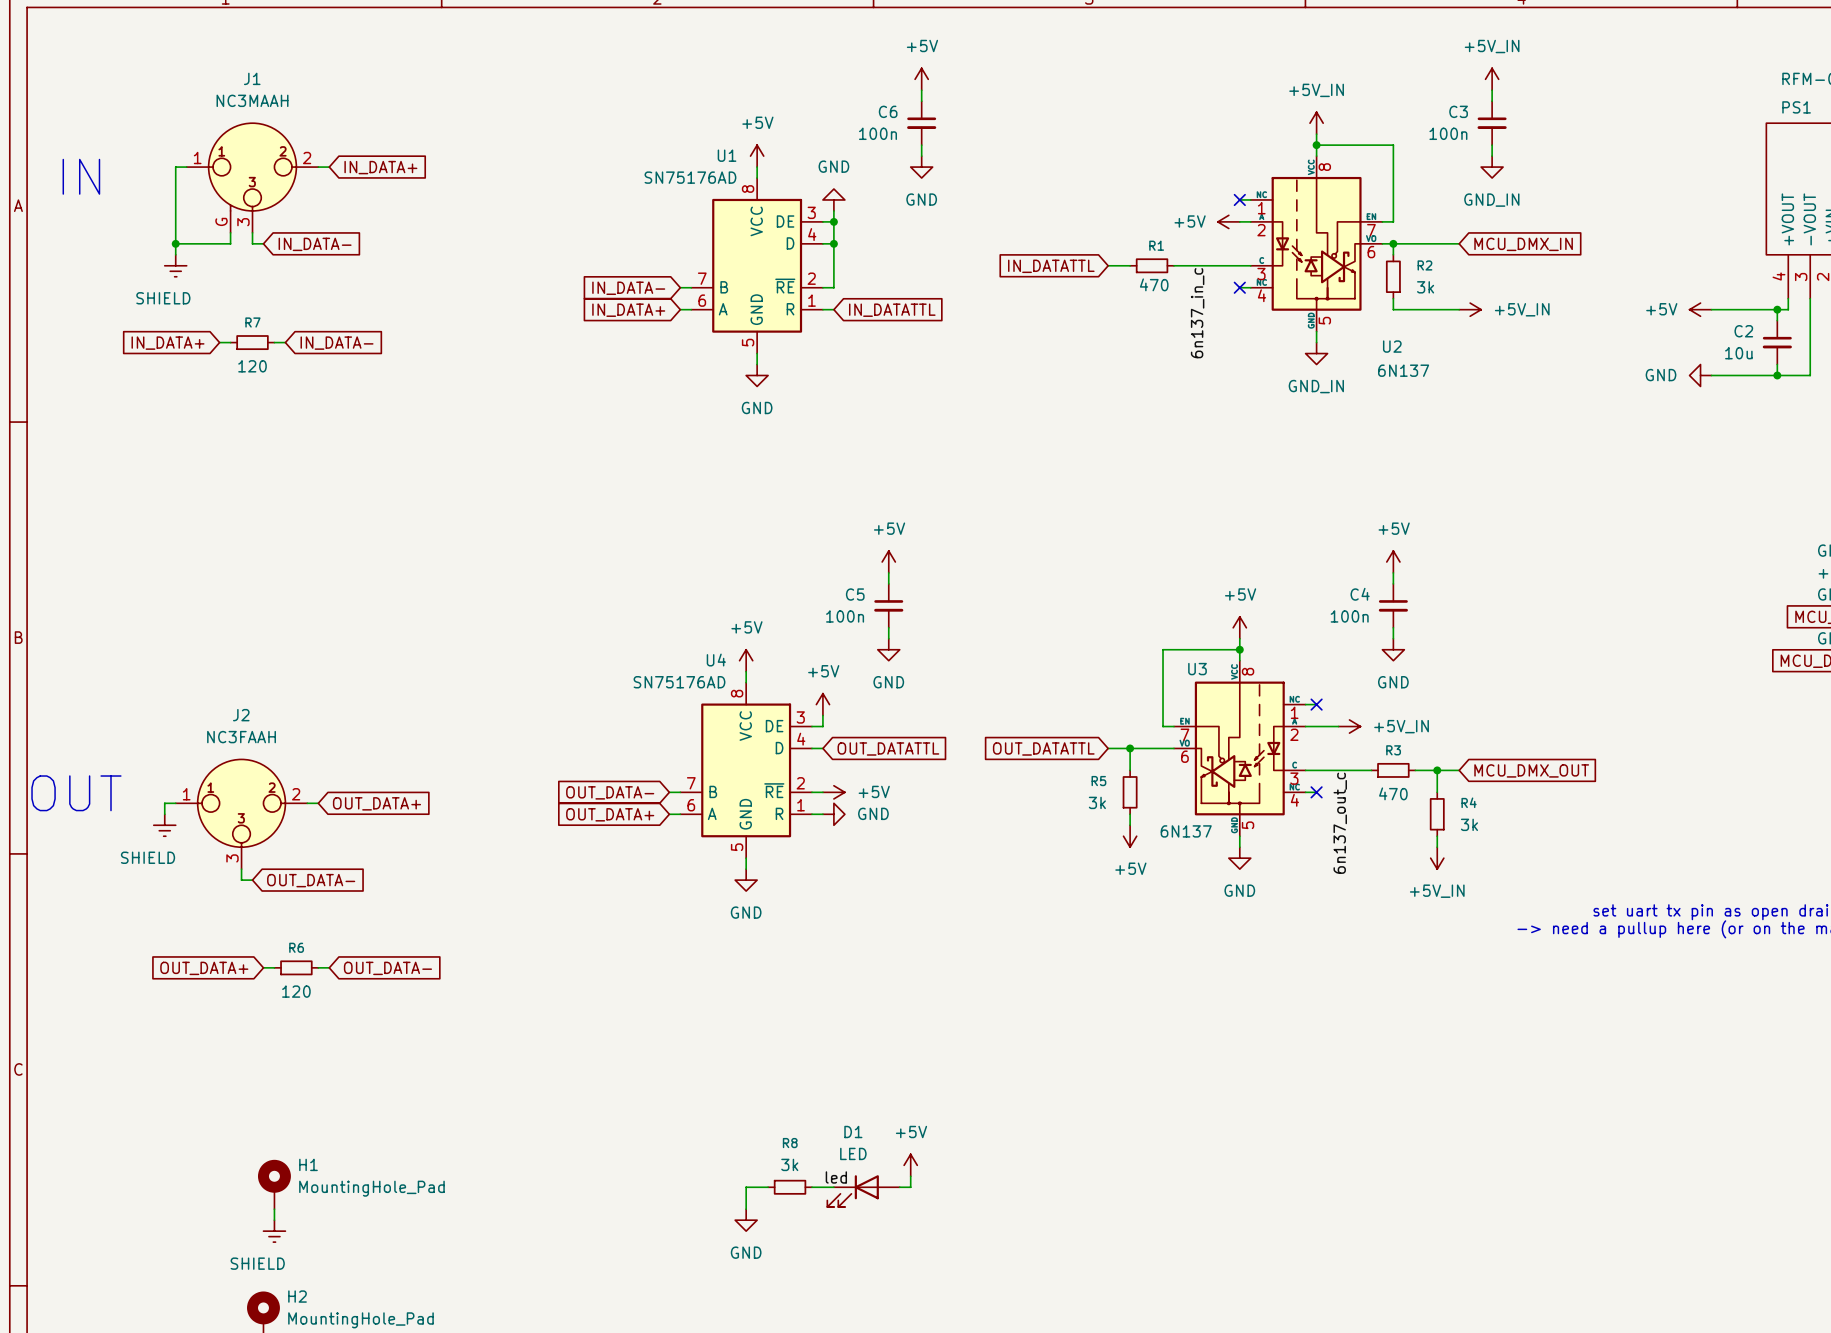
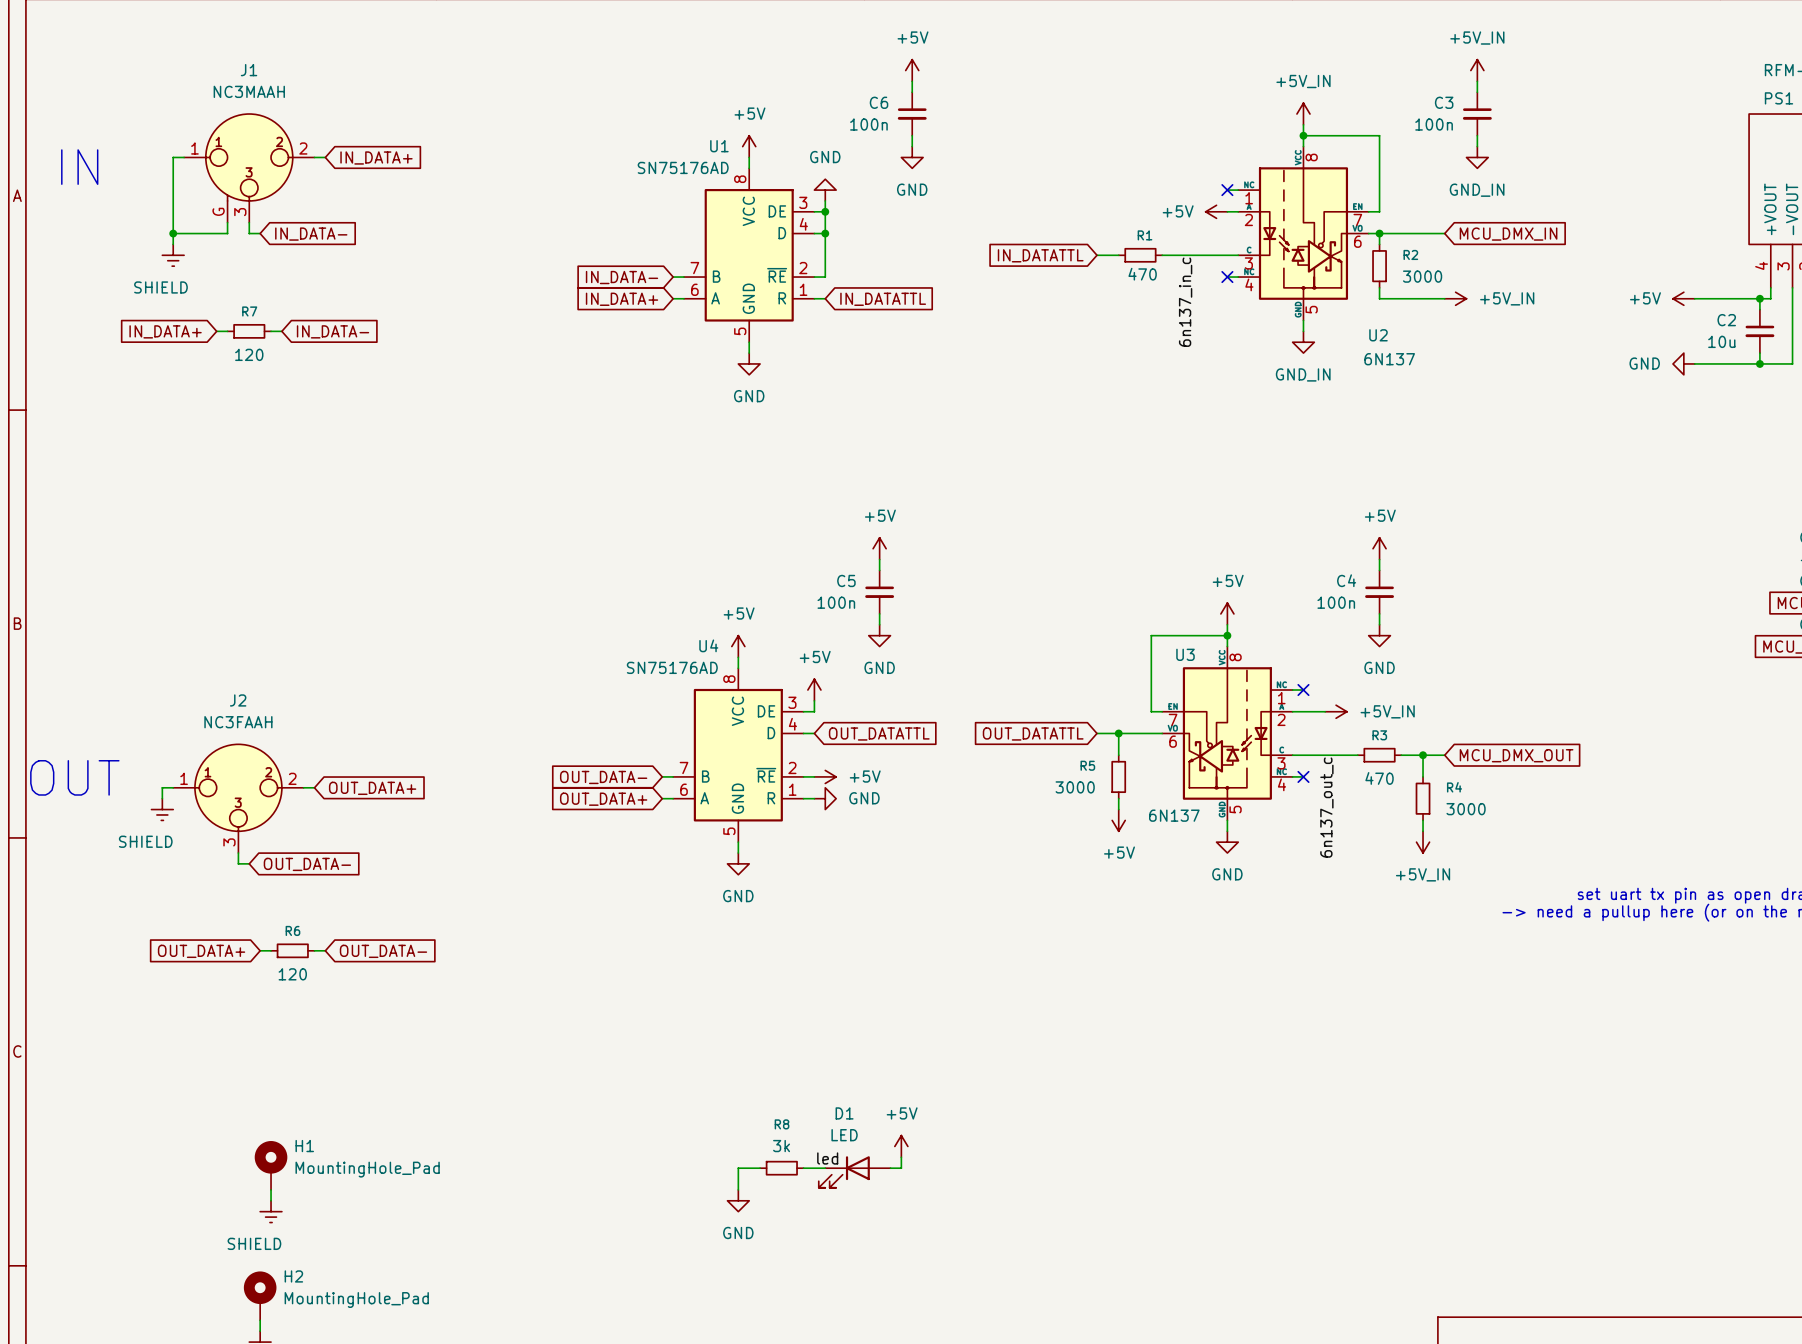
R2 value: 3k (1425, 287) -> 3000 (1422, 276)
R5 value: 3k (1097, 802) -> 3000 (1075, 787)
R4 value: 3k (1469, 824) -> 3000 (1466, 809)

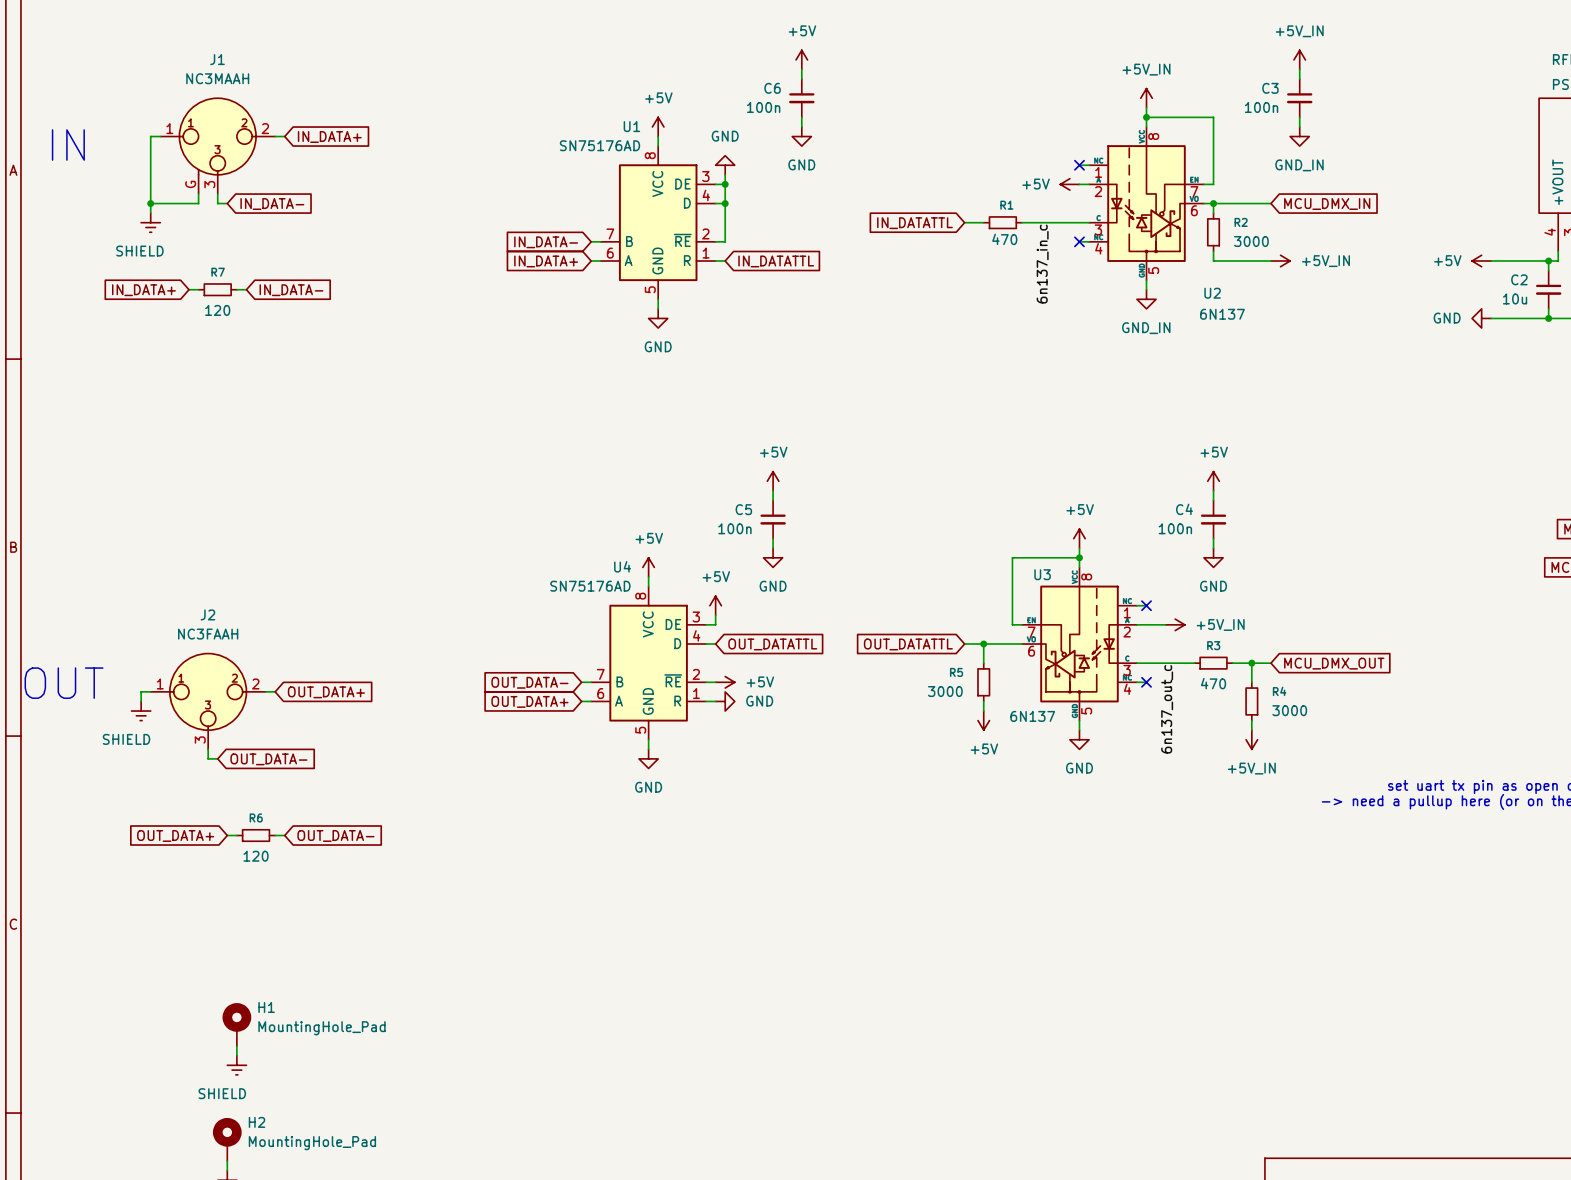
power symbol: +5V (901, 1146) -> none
wire: (901, 1157) (901, 1168) (890, 1168) -> none
label: led (827, 1158) -> none
wire: (760, 1168) (738, 1168) (738, 1189) -> none
R8: 3k (781, 1168) -> none
wire: (803, 1168) (825, 1168) -> none
D1: LED (854, 1171) -> none
power symbol: GND (738, 1200) -> none

